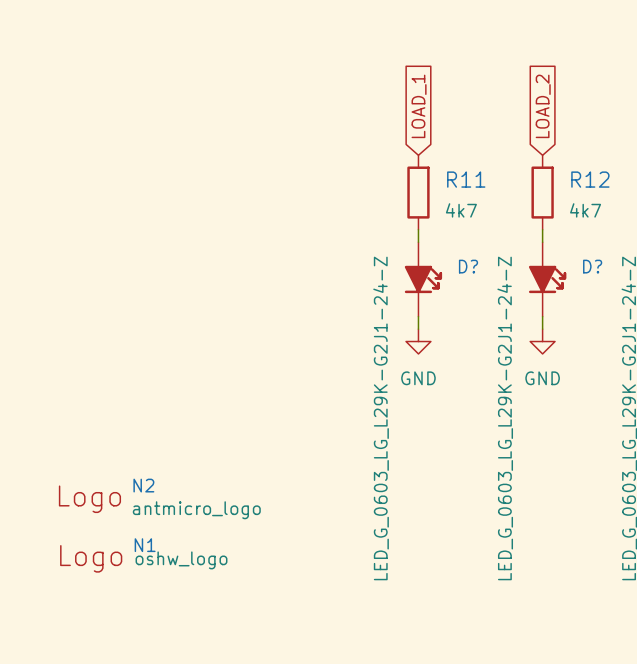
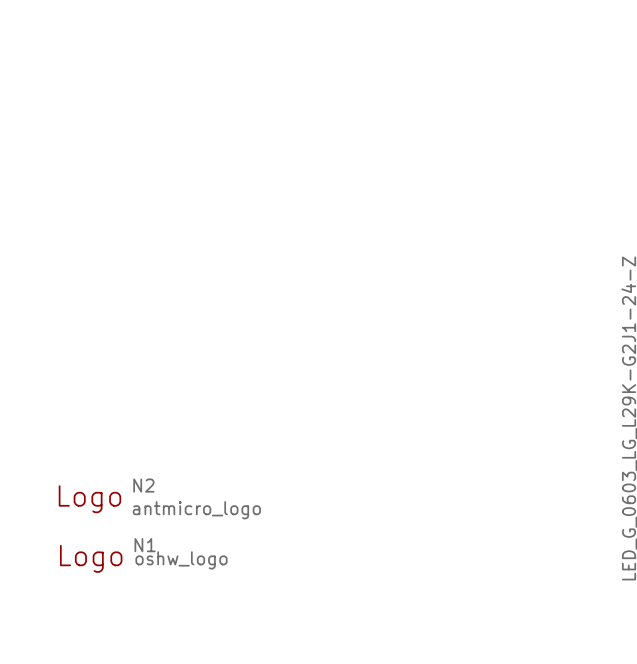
global label: LOAD_1 (419, 106) -> none
global label: LOAD_2 (543, 106) -> none
R11: (418, 192) -> none
R12: (542, 192) -> none
wire: (418, 229) (418, 242) -> none
wire: (542, 229) (542, 242) -> none
D?: LED_G_0603_LG_L29K-G2J1-24-Z (423, 279) -> none
D?: LED_G_0603_LG_L29K-G2J1-24-Z (547, 279) -> none
wire: (418, 316) (418, 329) -> none
wire: (542, 316) (542, 329) -> none
power symbol: GND (418, 341) -> none
power symbol: GND (542, 341) -> none

